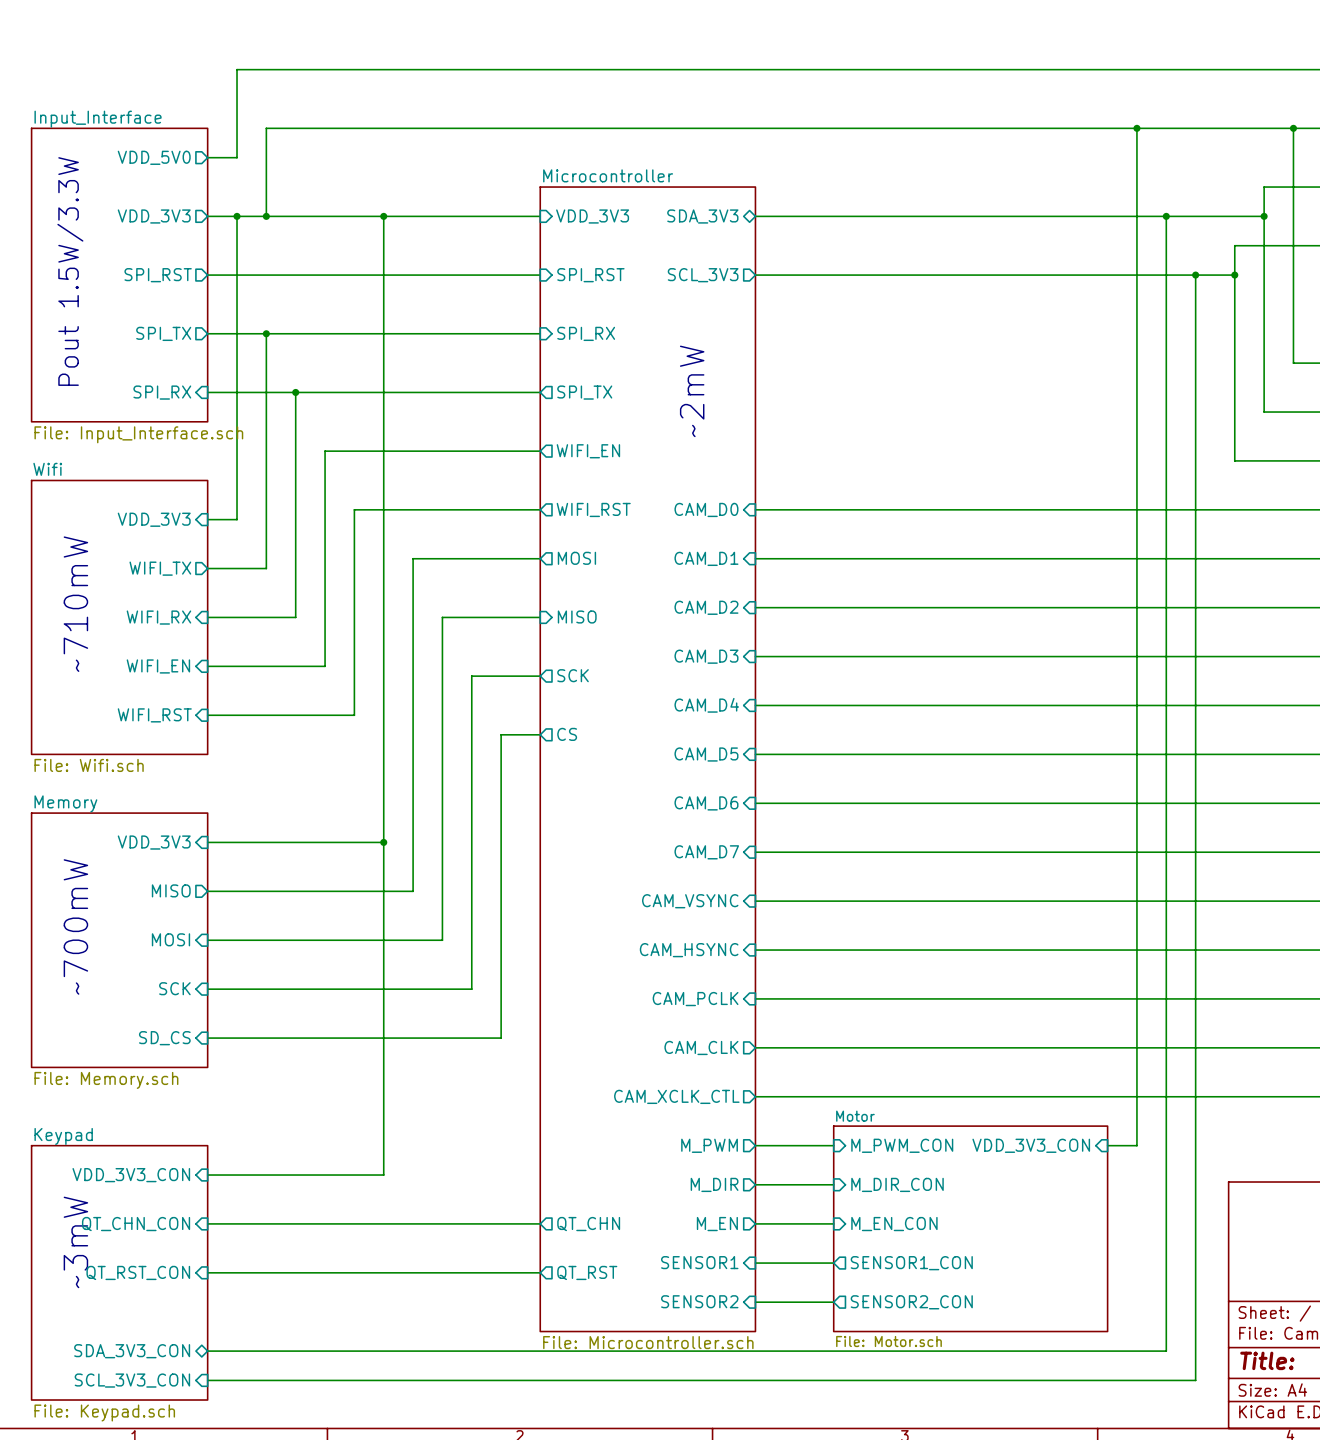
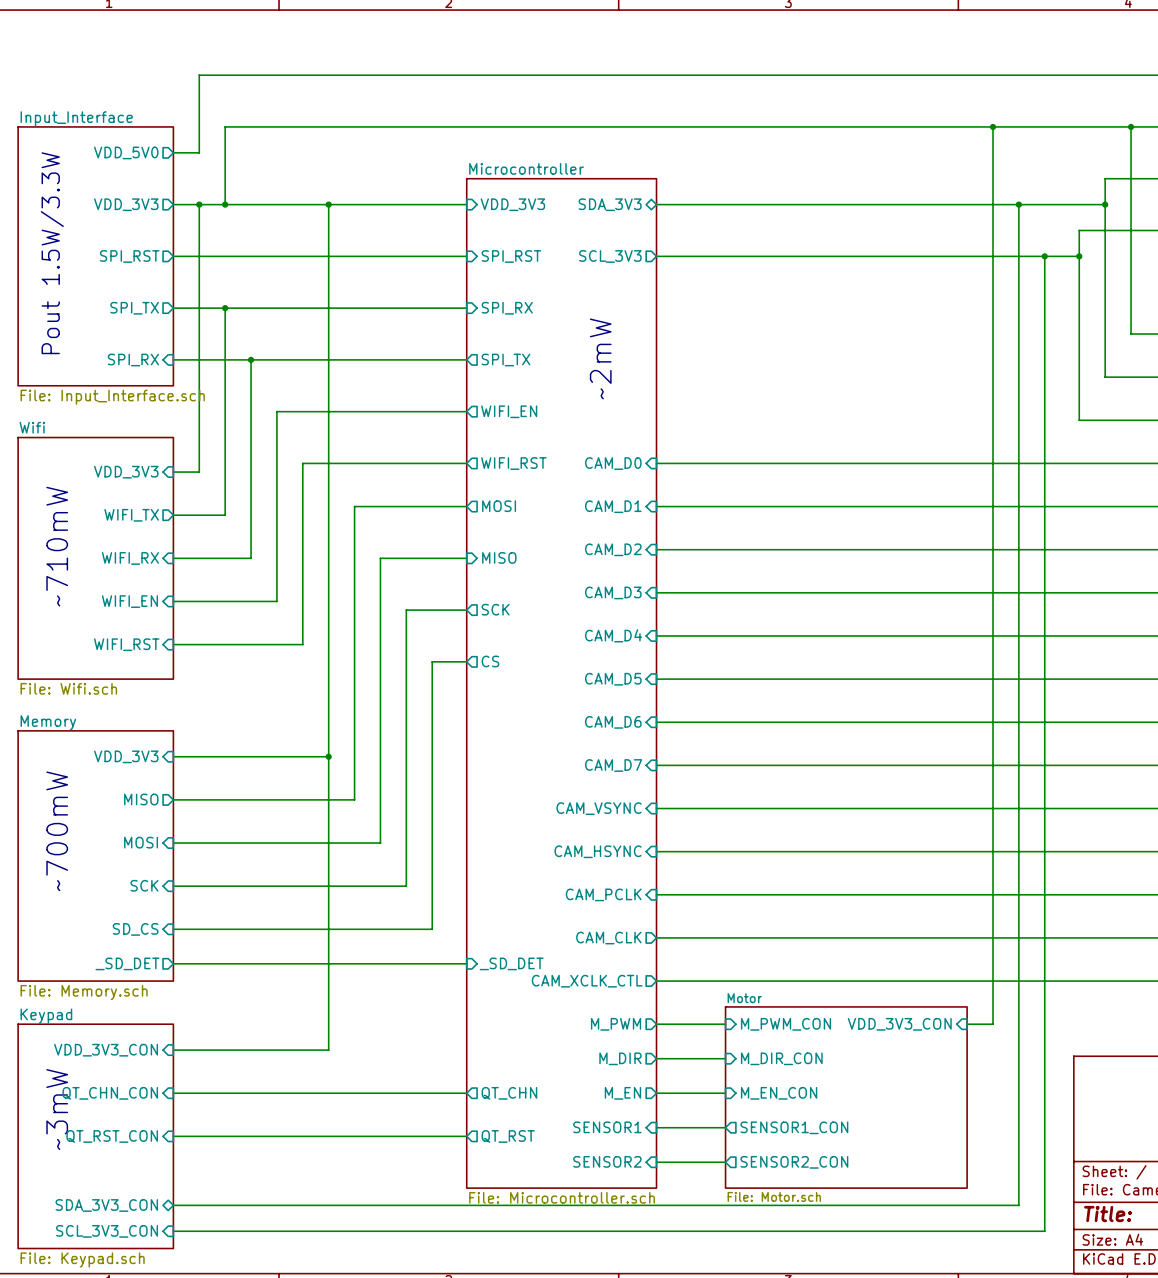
sheet Memory: File: Memory.sch (119, 940) -> none
sheet Memory: none -> File: Memory.sch (95, 855)
sheet pin: none -> _SD_DET (127, 963)
wire: none -> (173, 963) (466, 963)
sheet pin: none -> _SD_DET (511, 963)

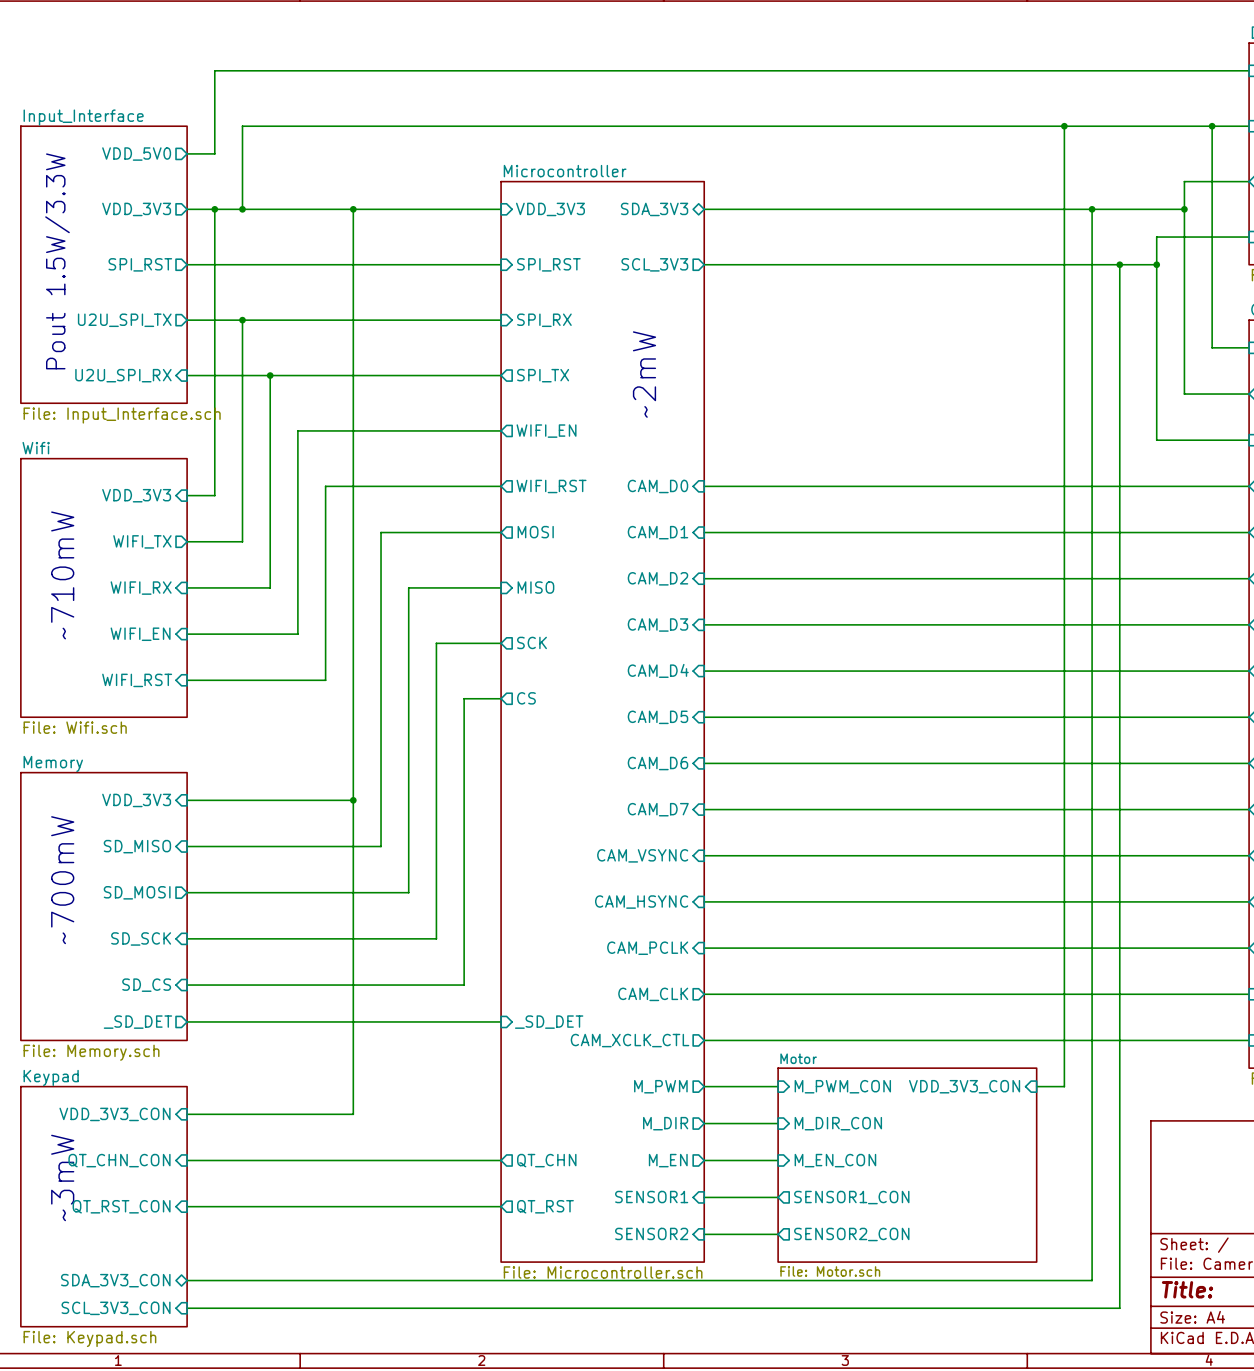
sheet pin: SPI_TX (134, 308) -> U2U_SPI_TX (124, 320)
sheet pin: SPI_RX (133, 360) -> U2U_SPI_RX (123, 375)
sheet pin shape: output (141, 799) -> input (137, 846)
sheet pin: MISO (141, 799) -> SD_MISO (137, 846)
sheet pin shape: input (141, 842) -> output (137, 892)
sheet pin: MOSI (141, 842) -> SD_MOSI (137, 892)
sheet pin: SCK (144, 885) -> SD_SCK (141, 938)

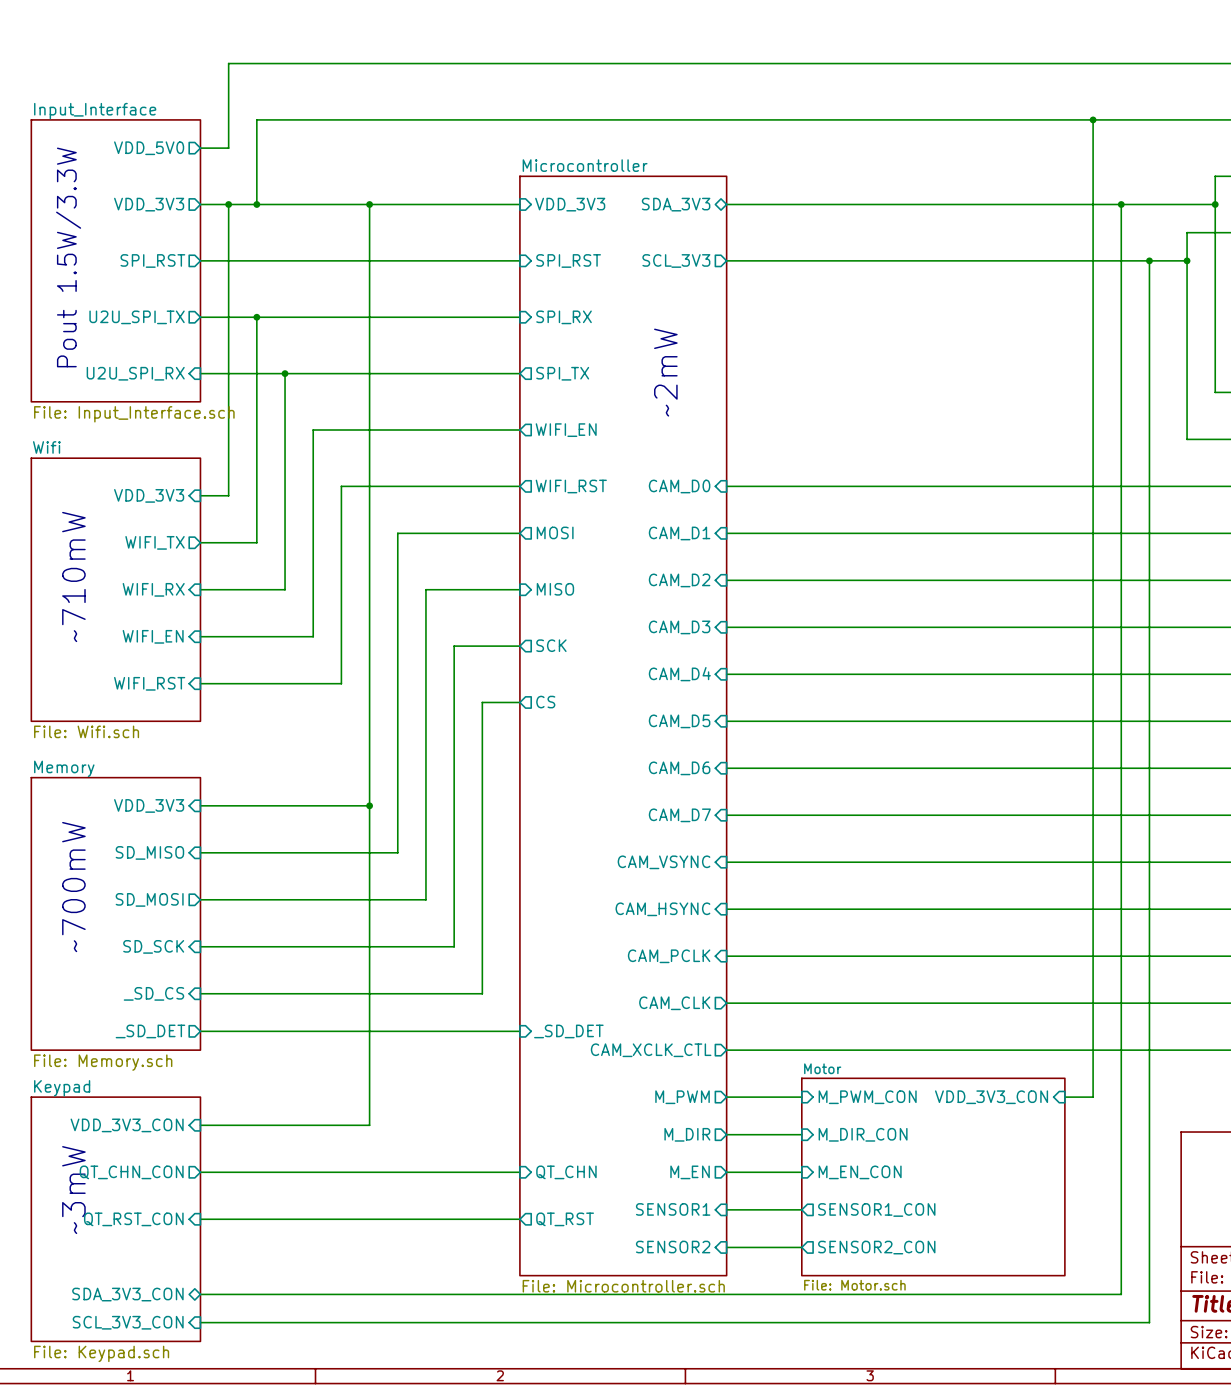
sheet pin: SD_CS (146, 985) -> _SD_CS (153, 993)
sheet pin shape: input (119, 1160) -> output (131, 1172)
sheet pin shape: output (546, 1160) -> input (566, 1172)

